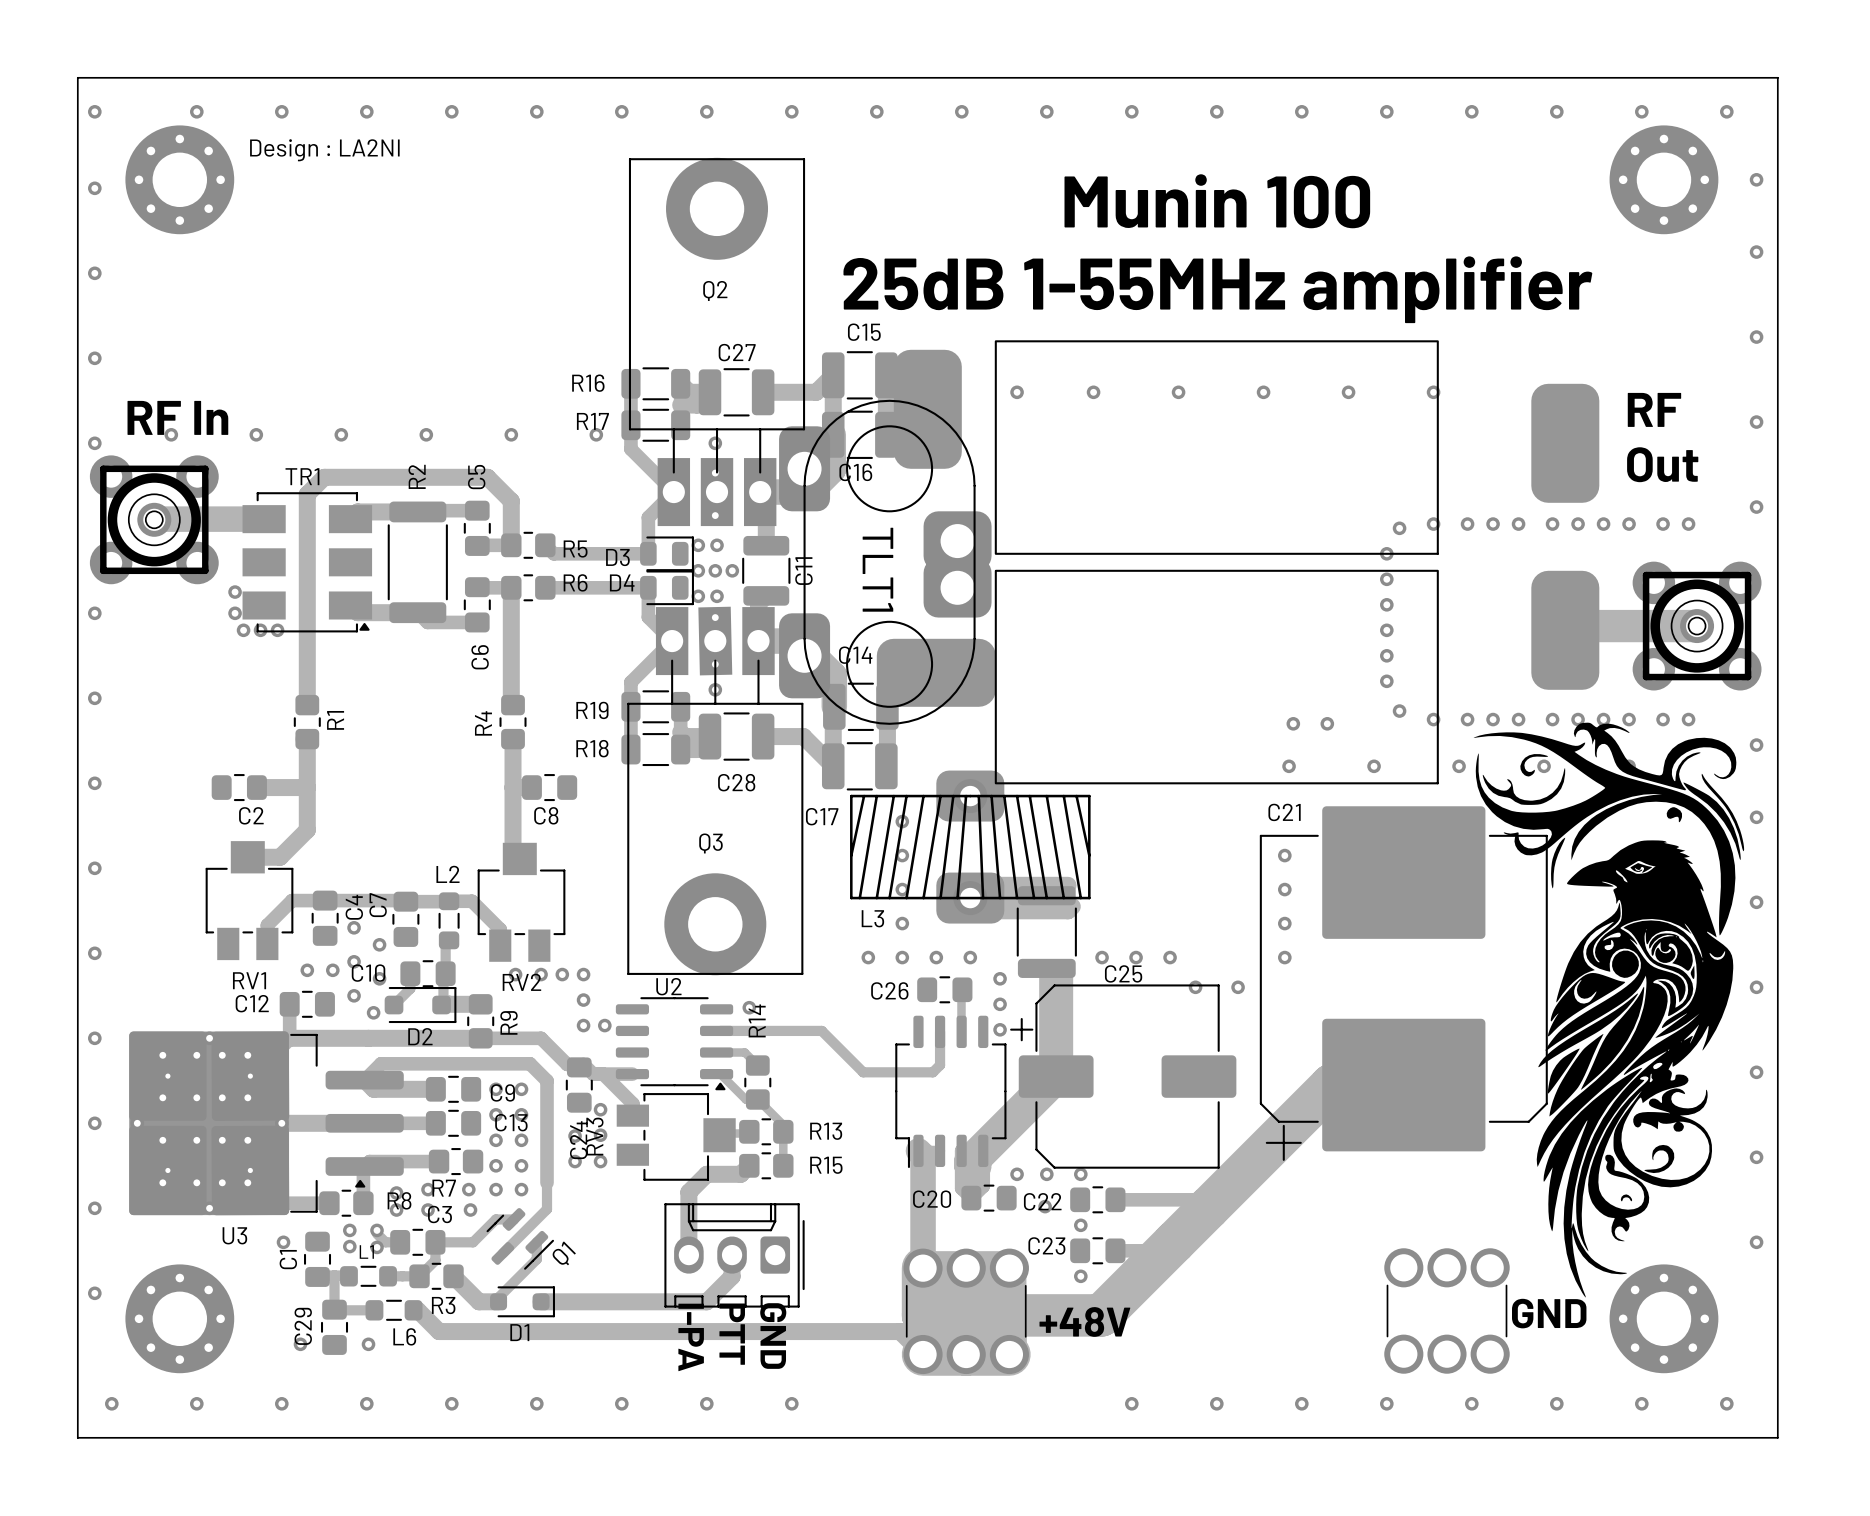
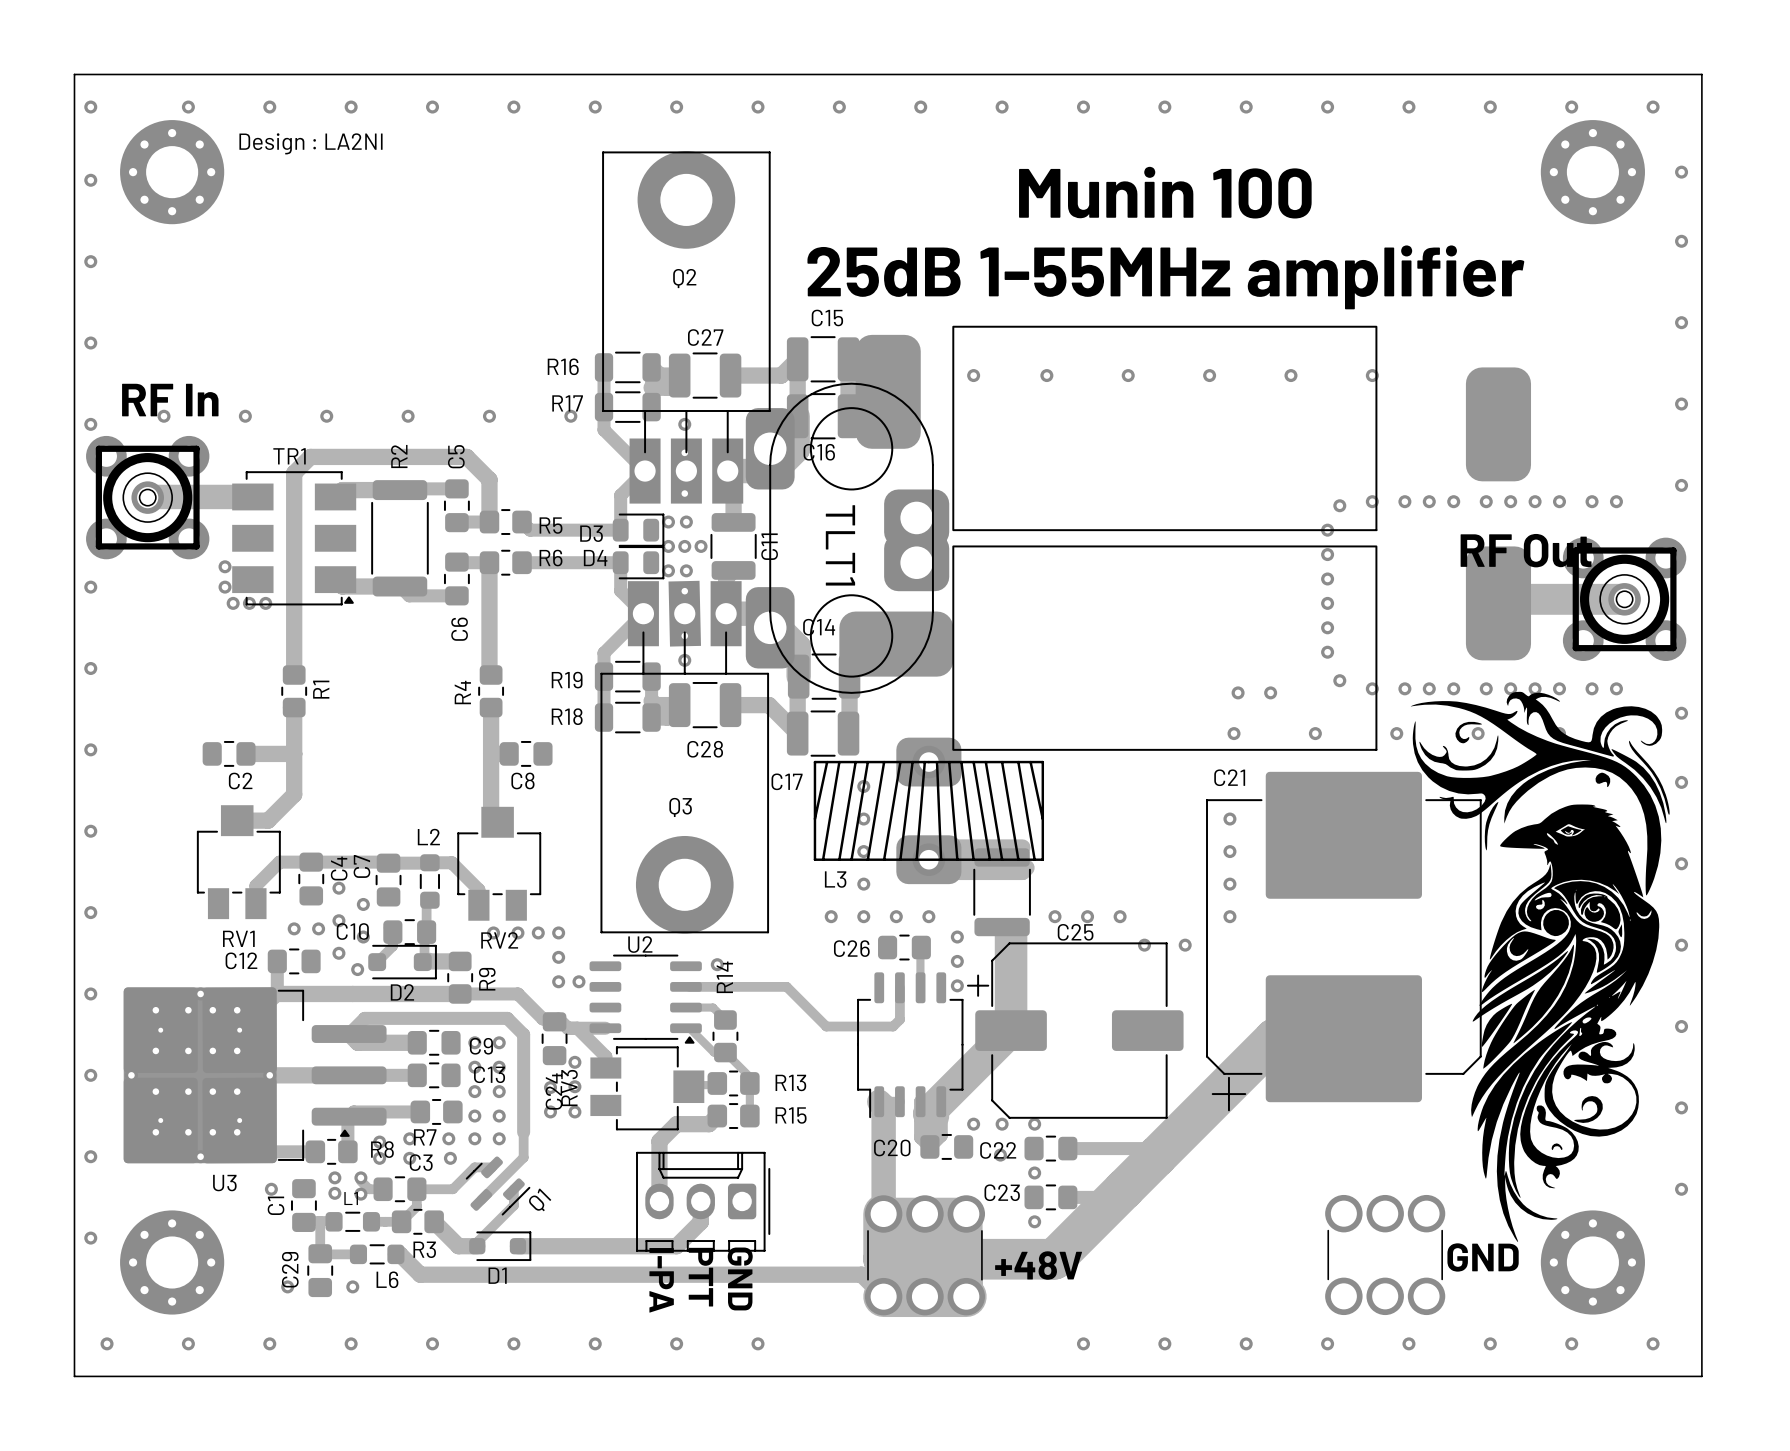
text: RF (1654, 409) -> none
text: Out (1662, 464) -> none
text: none -> RF Out (1526, 550)

